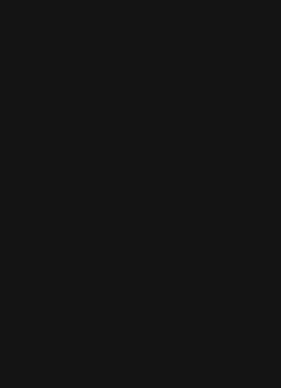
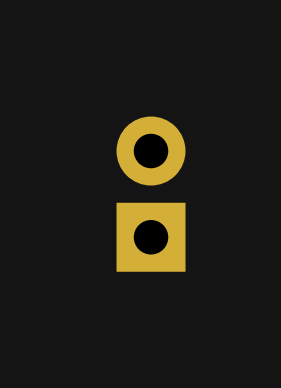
part: none -> (151, 194)

